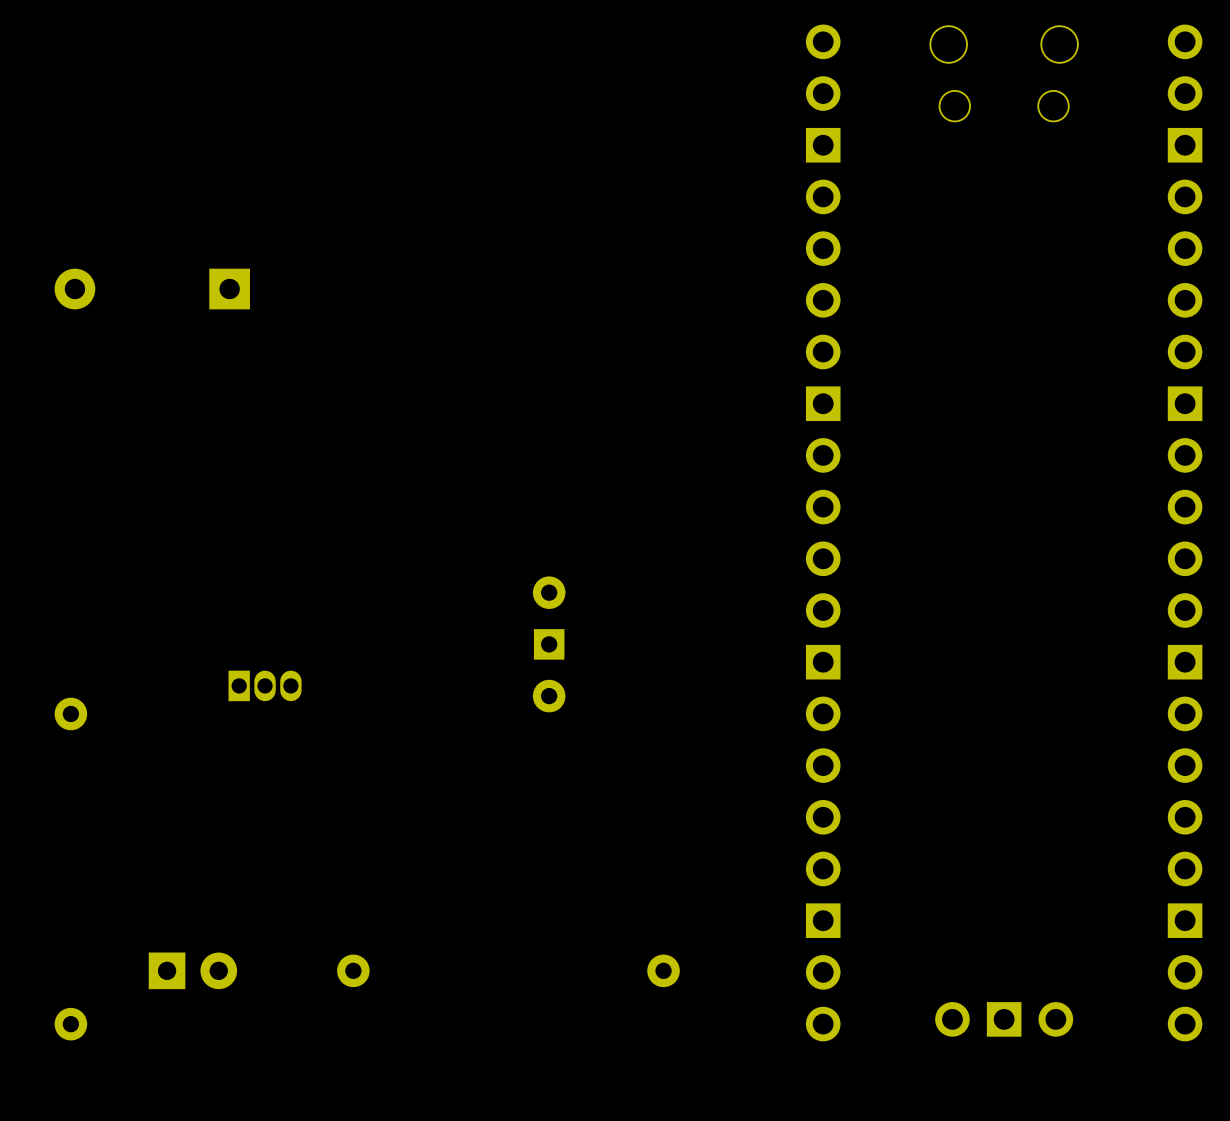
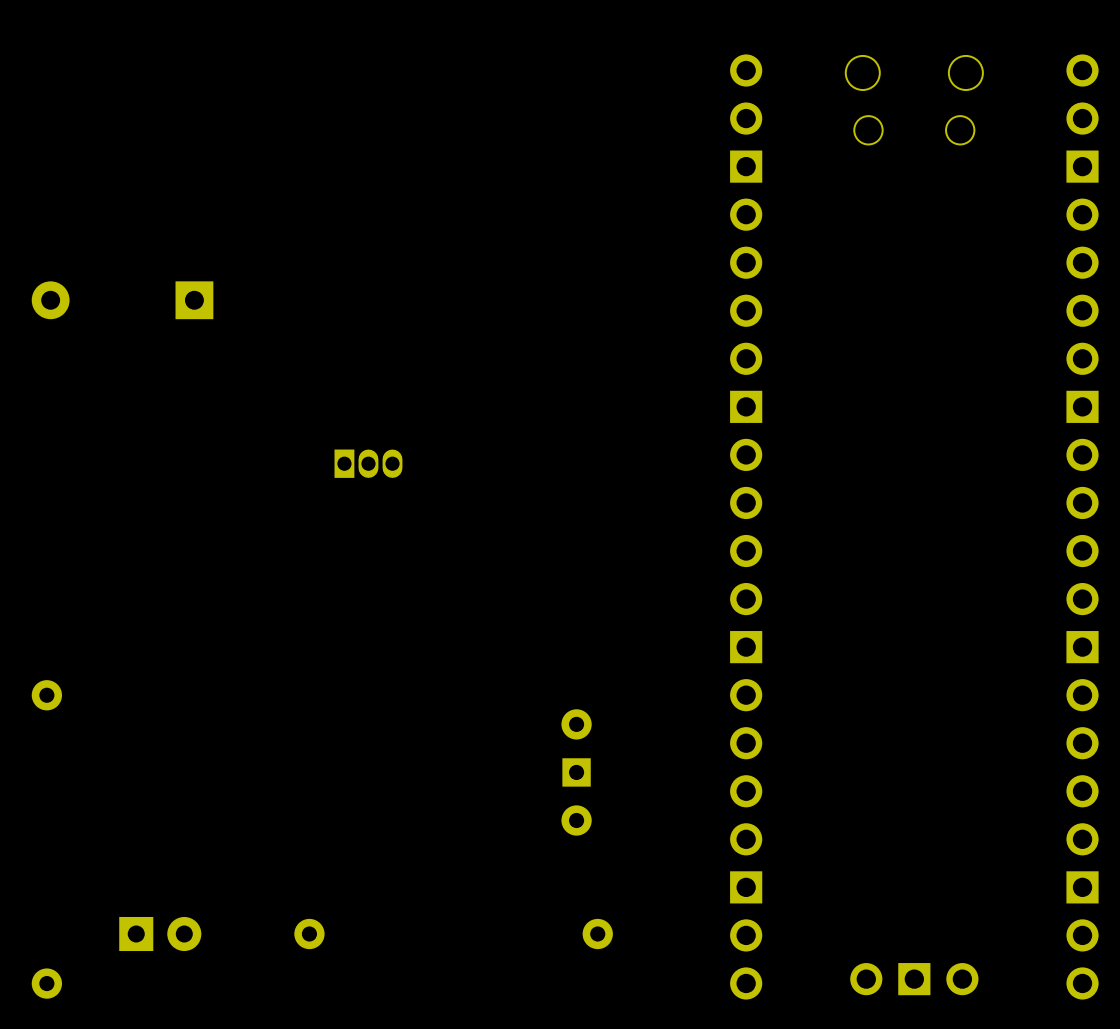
part position: (549, 644) -> (576, 772)
part position: (265, 685) -> (368, 463)

